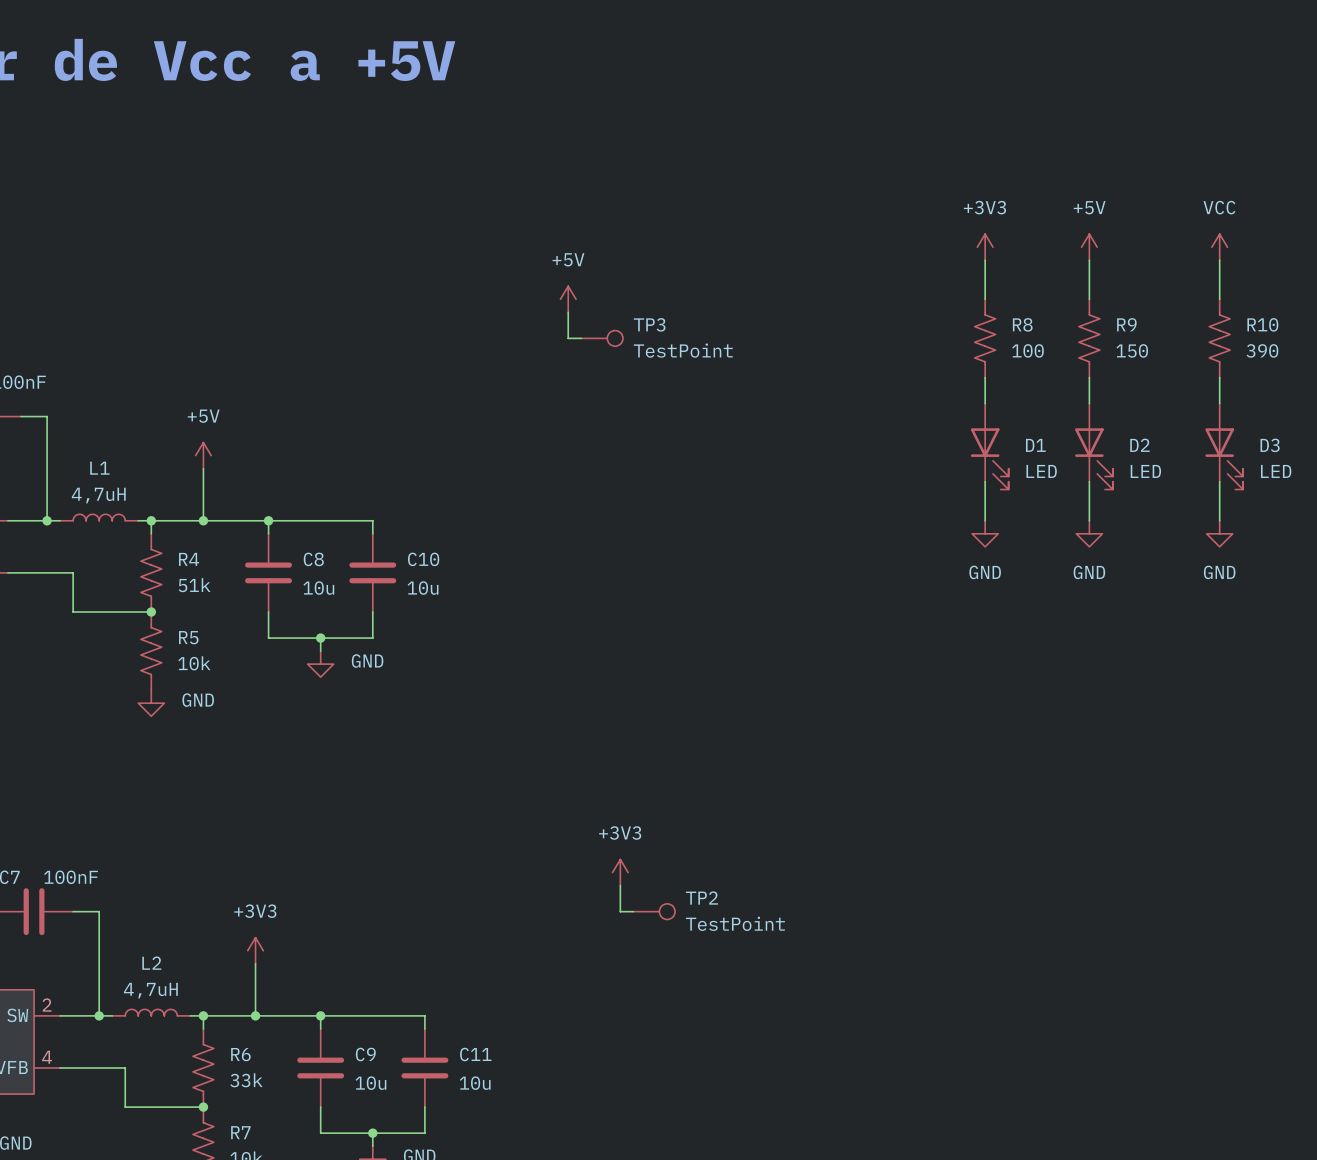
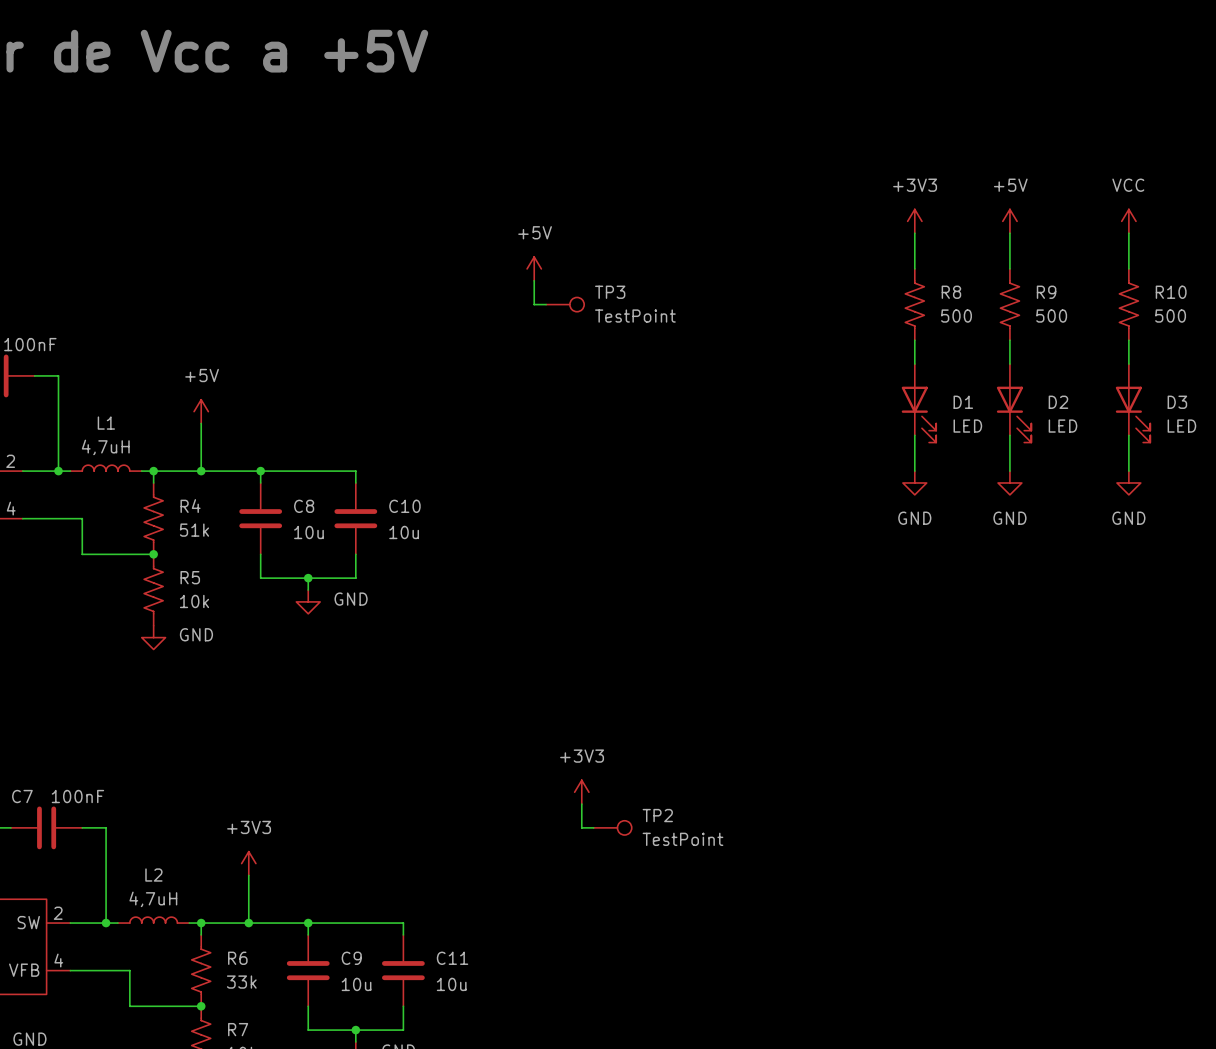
R8 value: 100 (1027, 350) -> 500 (956, 316)
R9 value: 150 (1132, 350) -> 500 (1051, 316)
R10 value: 390 (1262, 350) -> 500 (1170, 316)

